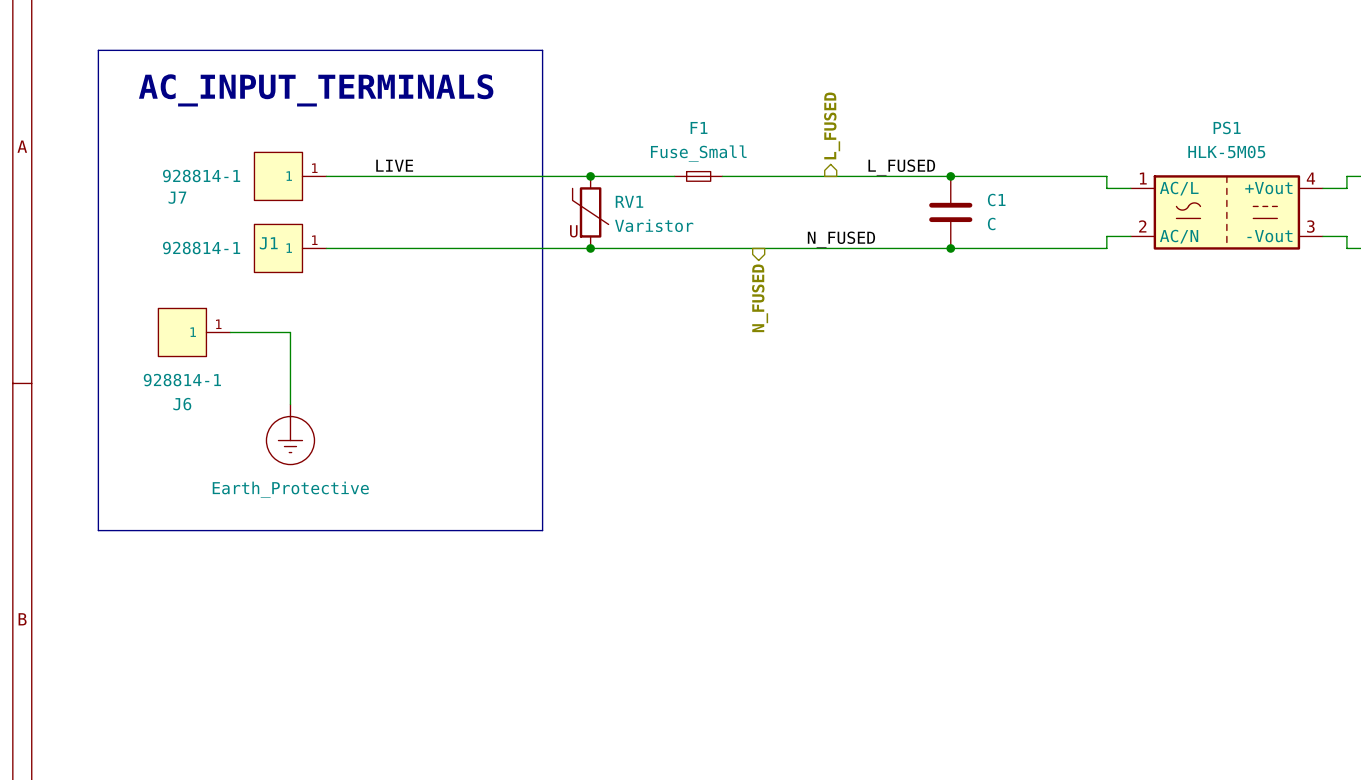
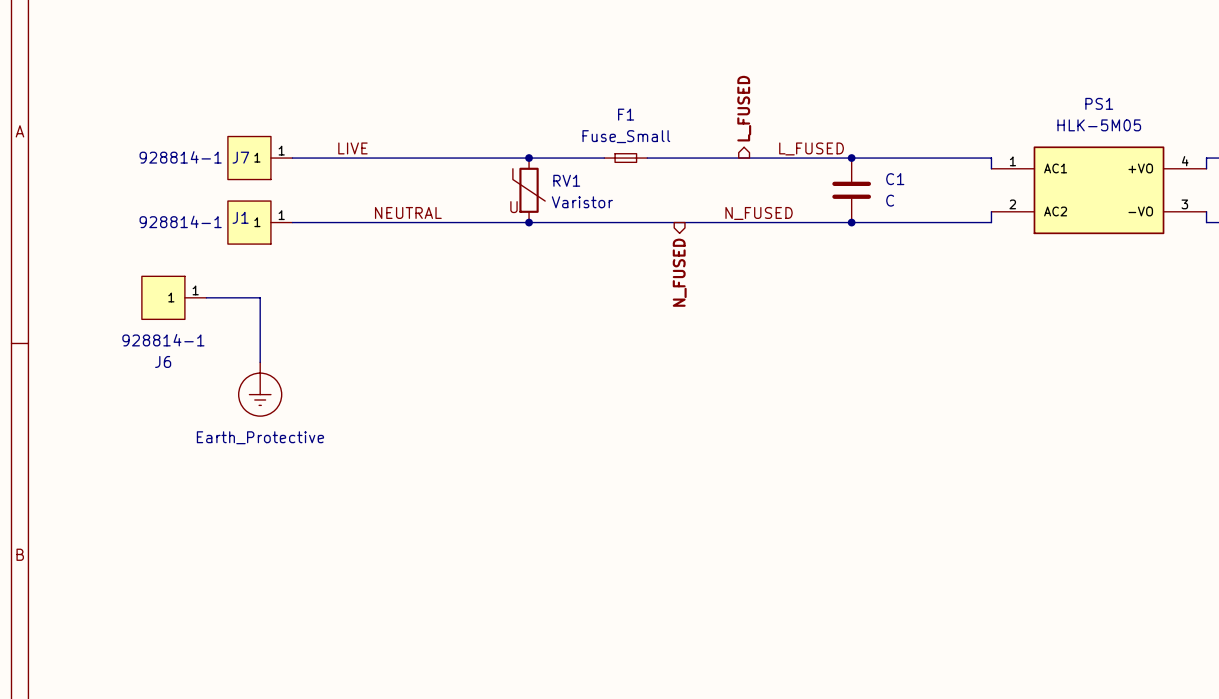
line: (98, 50) (542, 50) (542, 530) (98, 530) (98, 50) -> none
text: AC_INPUT_TERMINALS (316, 90) -> none
PS1 symbol: [1130, 175, 1323, 250] -> [991, 146, 1207, 235]
J7 name position: J7 (177, 197) -> J7 (240, 157)
label: none -> NEUTRAL (408, 212)

